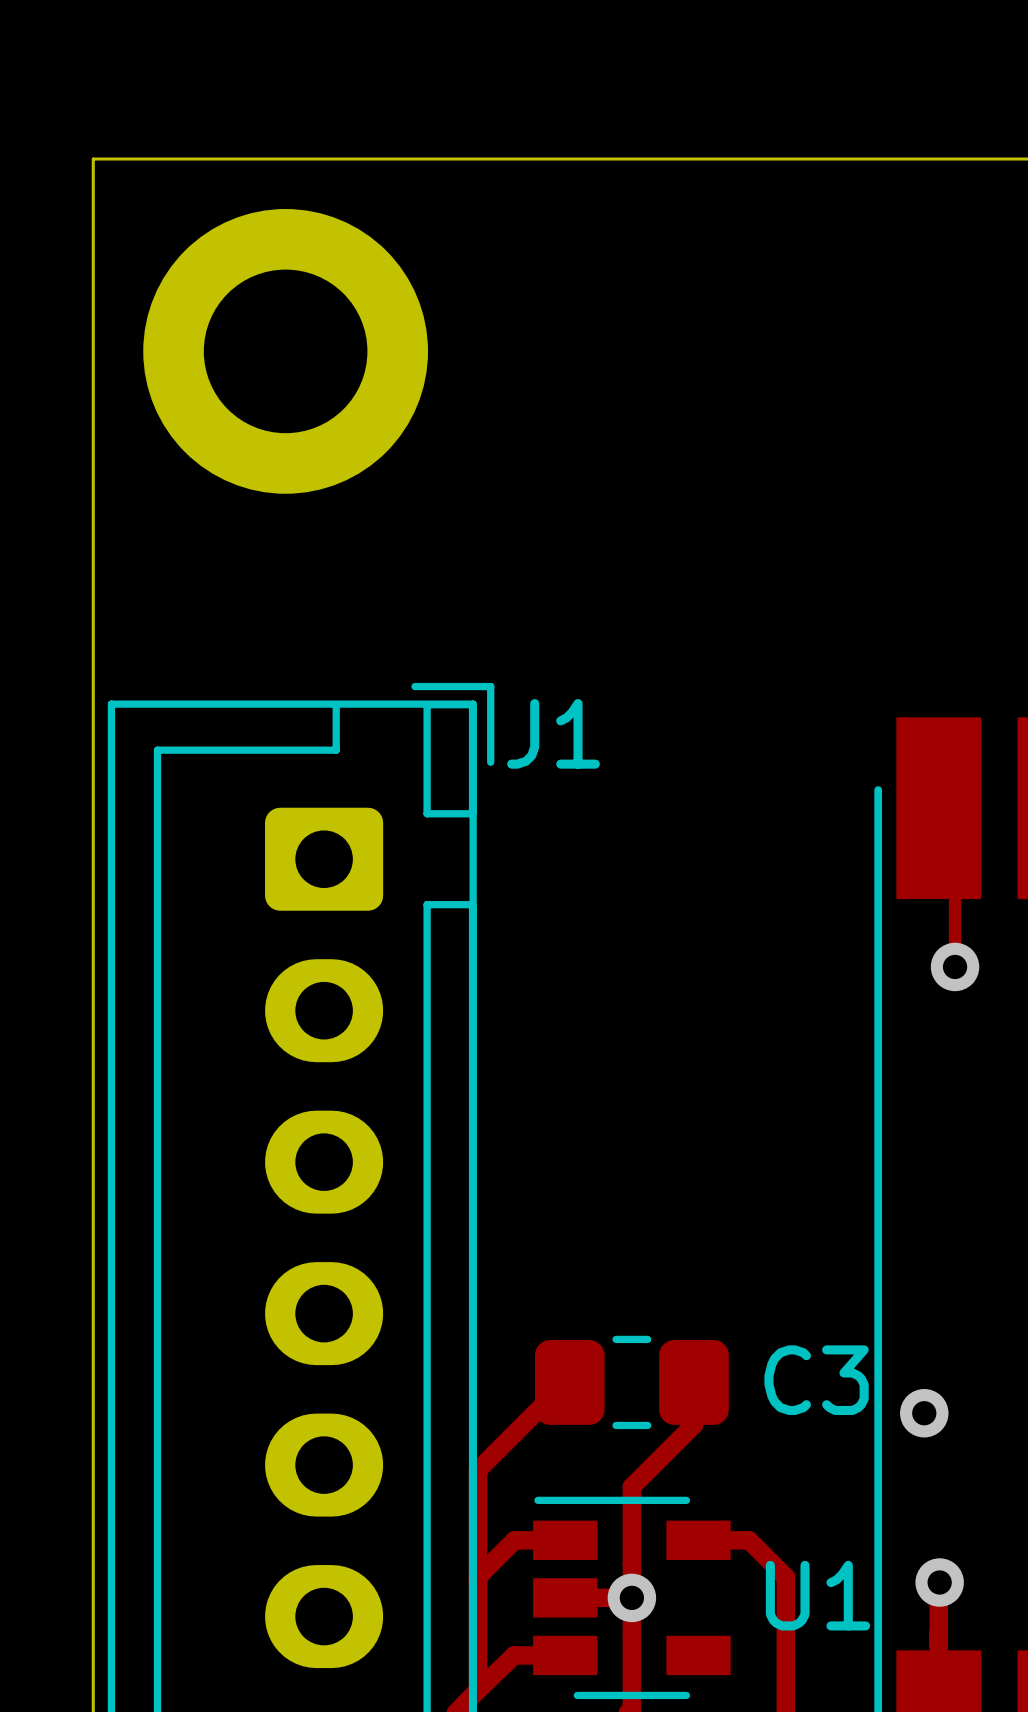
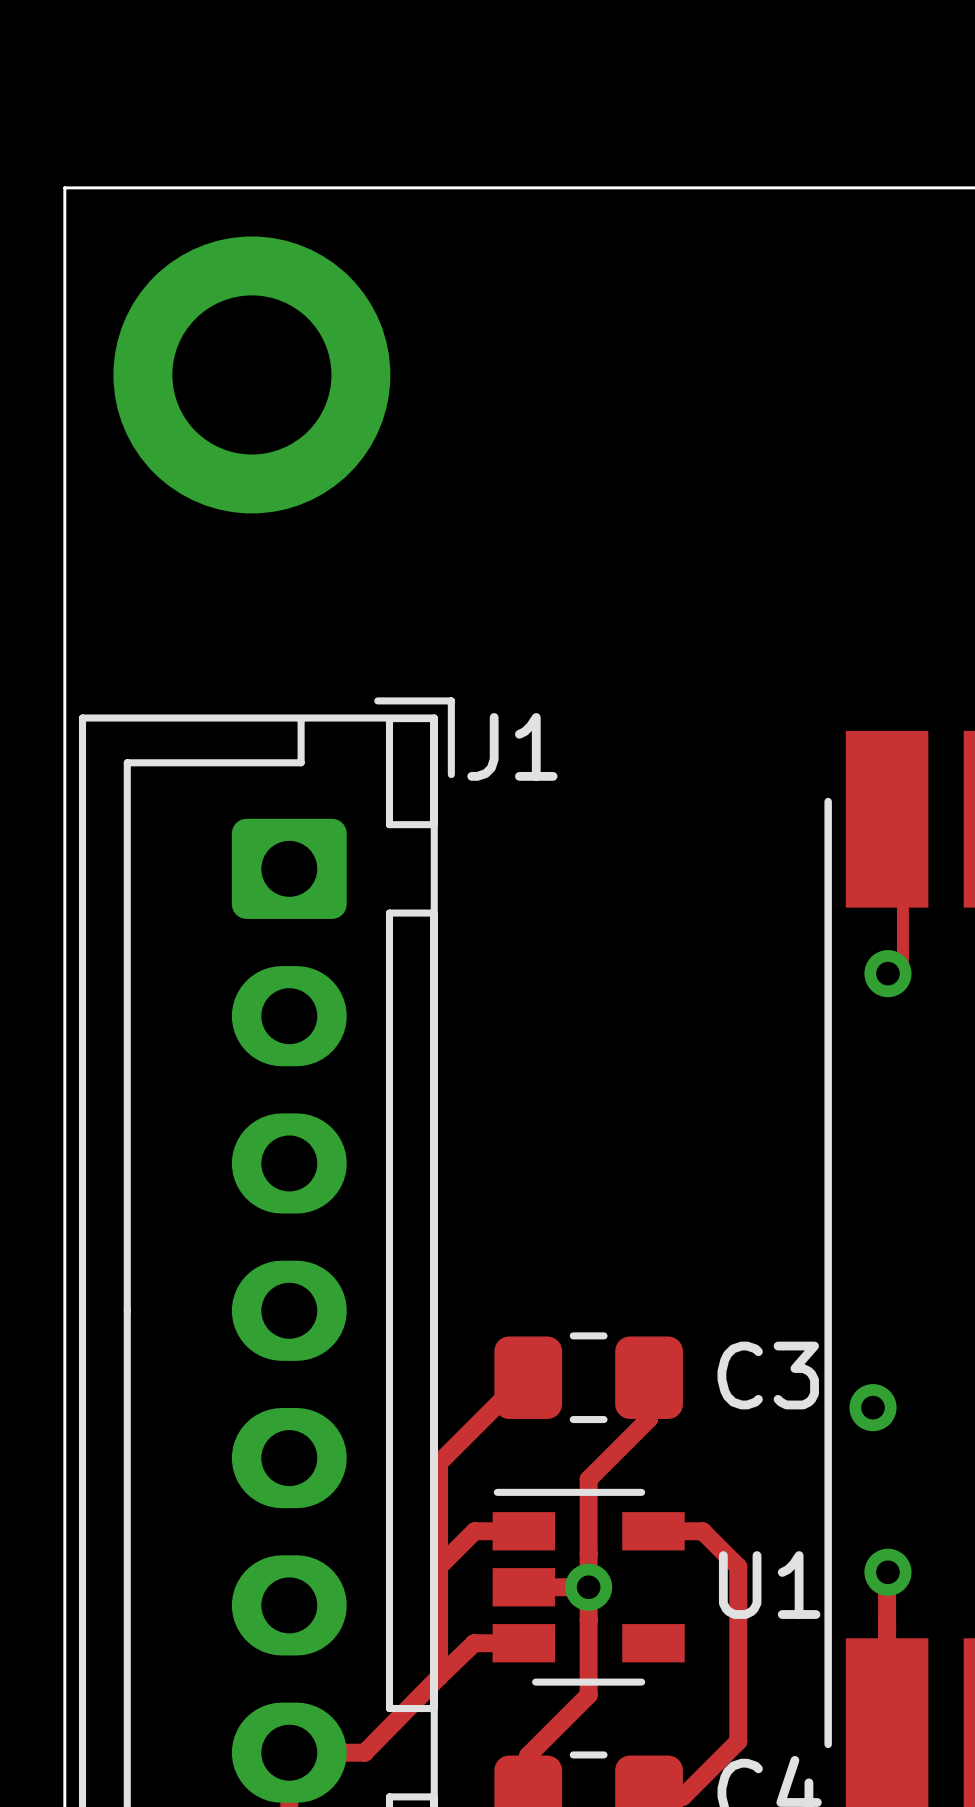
via position: (955, 966) -> (887, 973)

